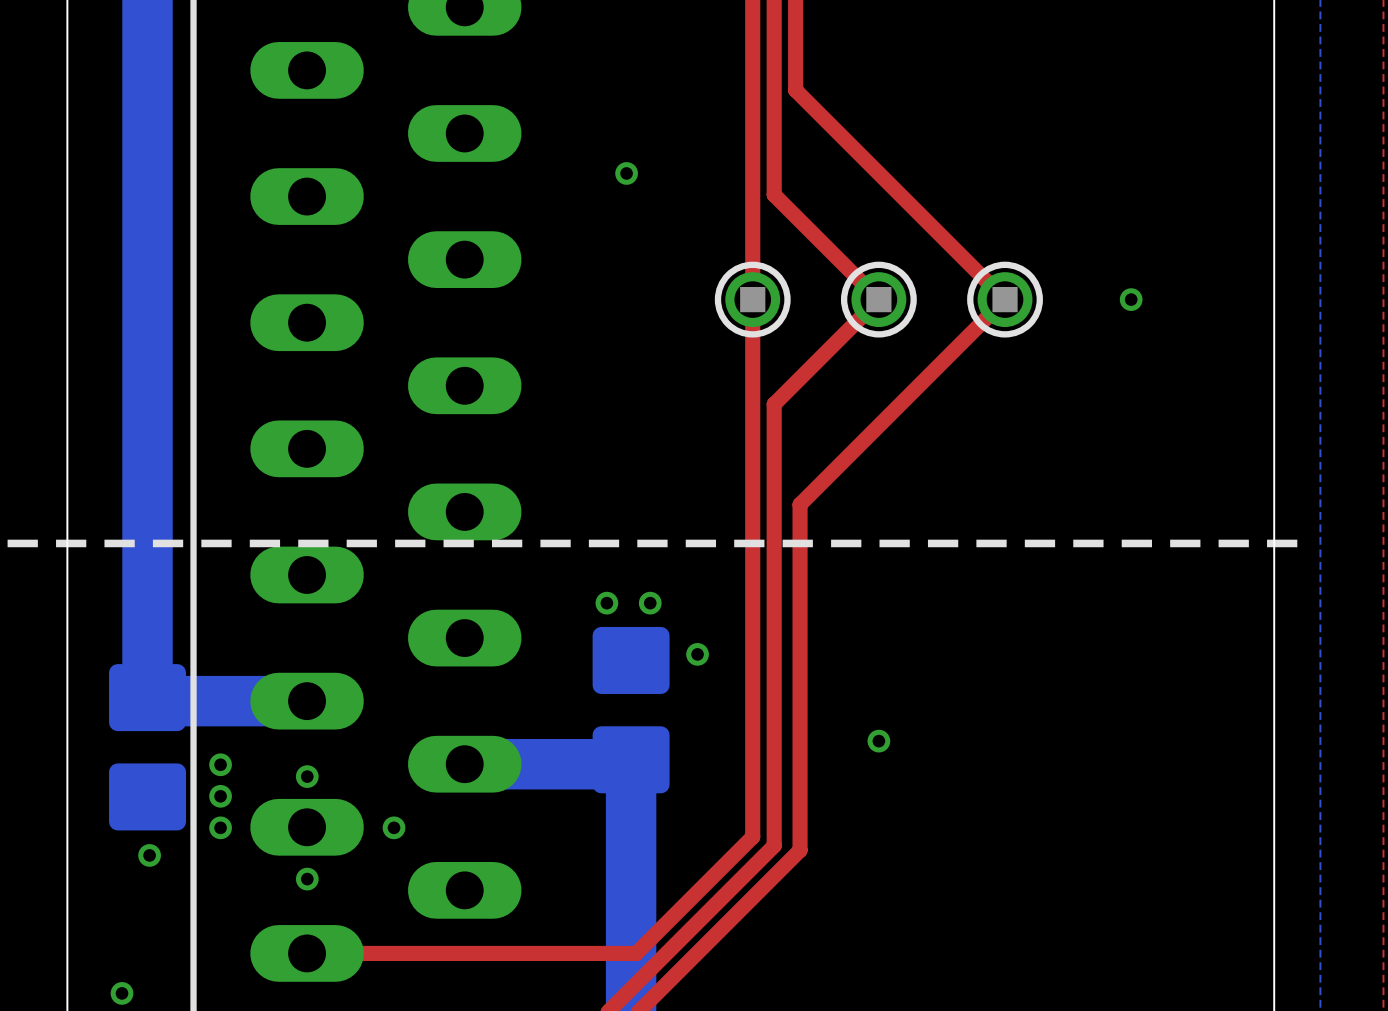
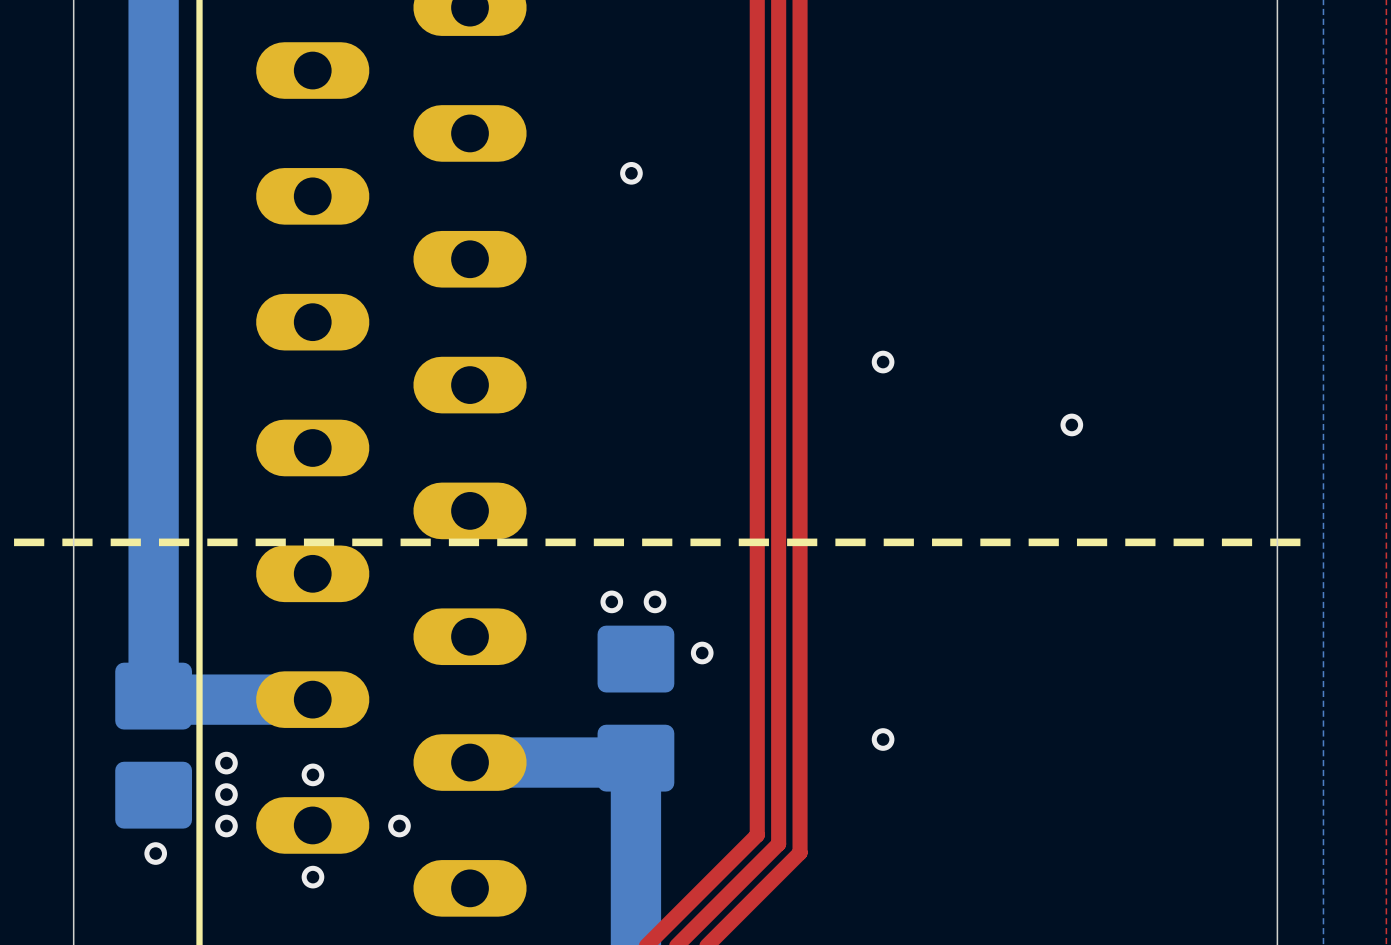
top track: (795, 90) (1005, 299) (800, 504) (800, 850) (795, 854) -> (800, 90) (800, 852)
top track: (774, 194) (878, 299) (774, 404) -> (778, 194) (778, 403)
part: (752, 299) -> none
part: (878, 299) -> none
part: (1005, 299) -> none
via: (1131, 299) -> none
via: none -> (883, 362)
via: none -> (1071, 424)

